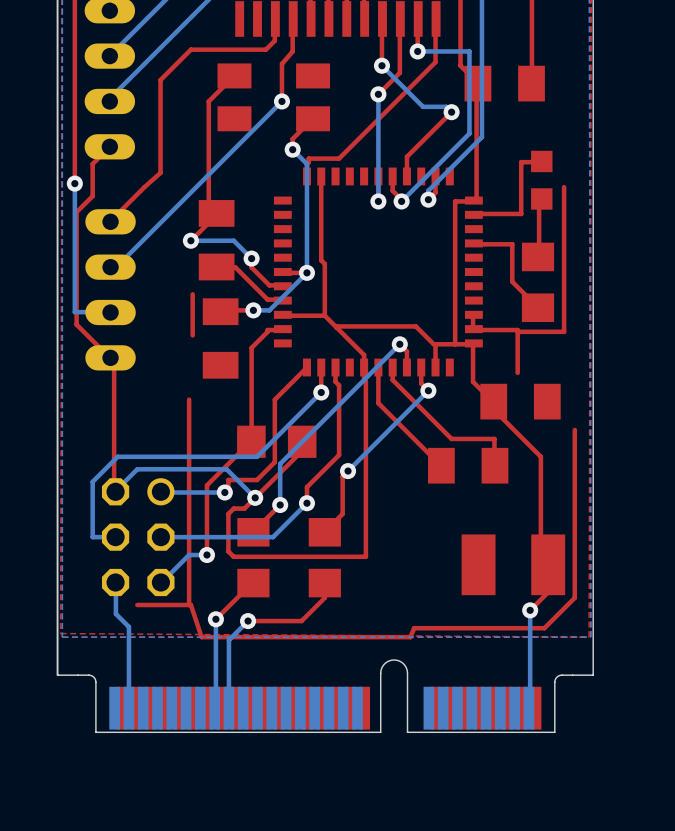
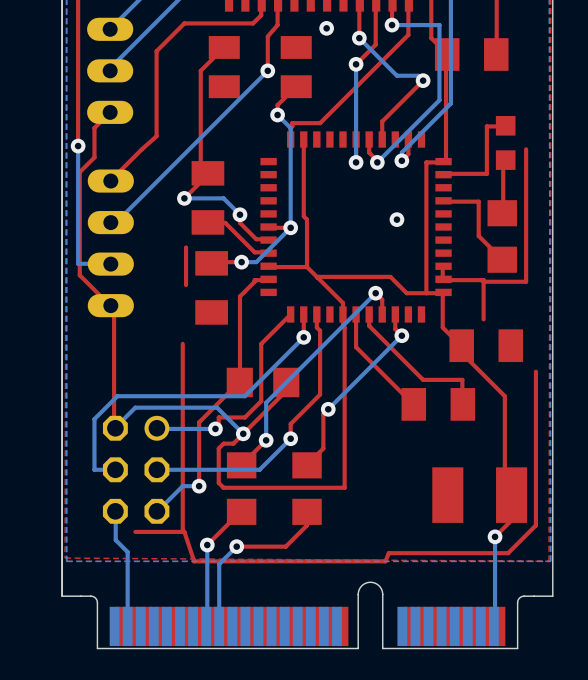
via: none -> (326, 28)
via: none -> (396, 219)
top track: (435, 344) (435, 367) -> none

